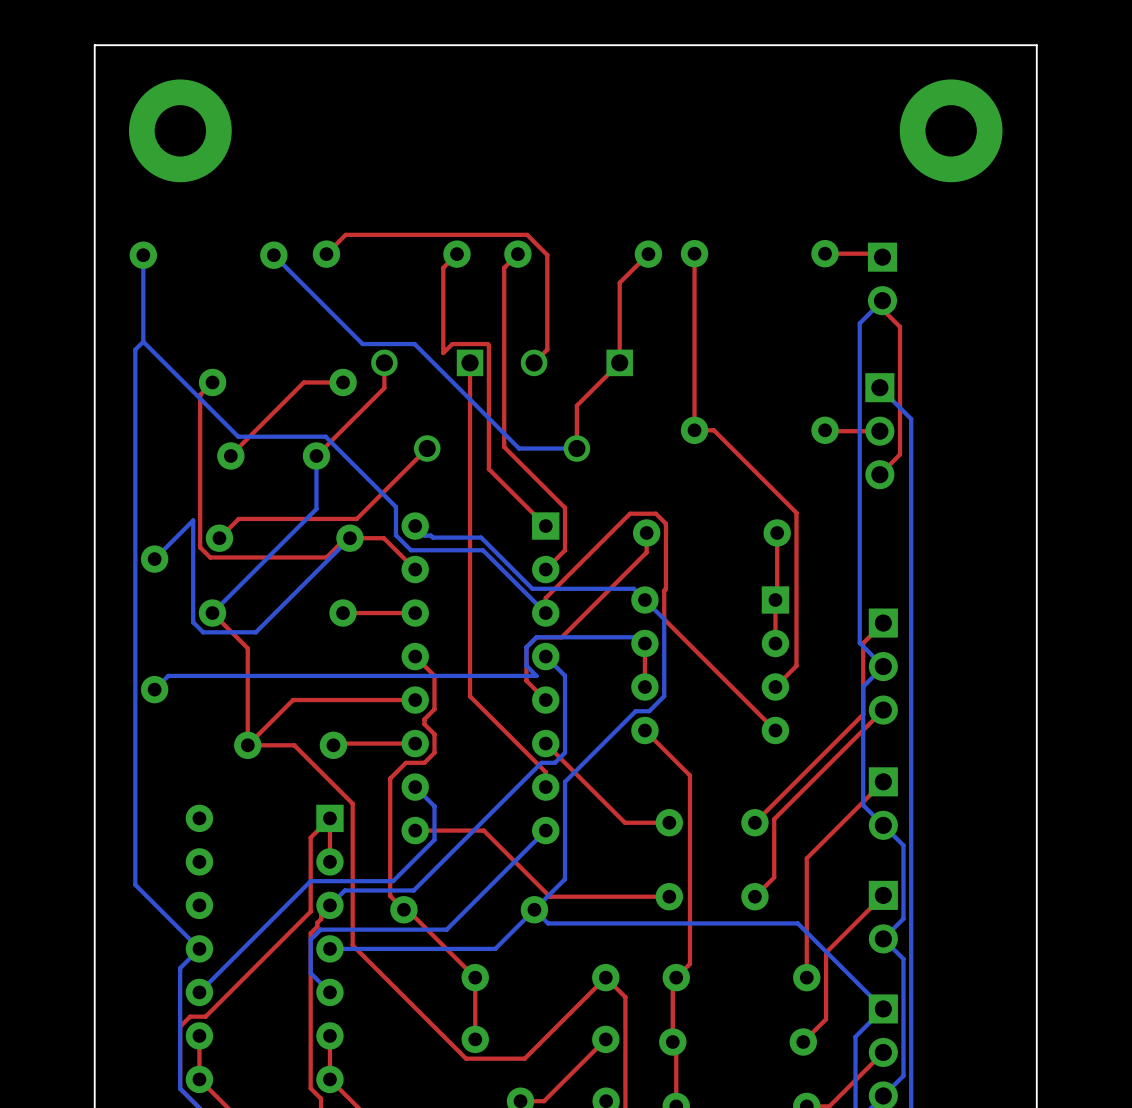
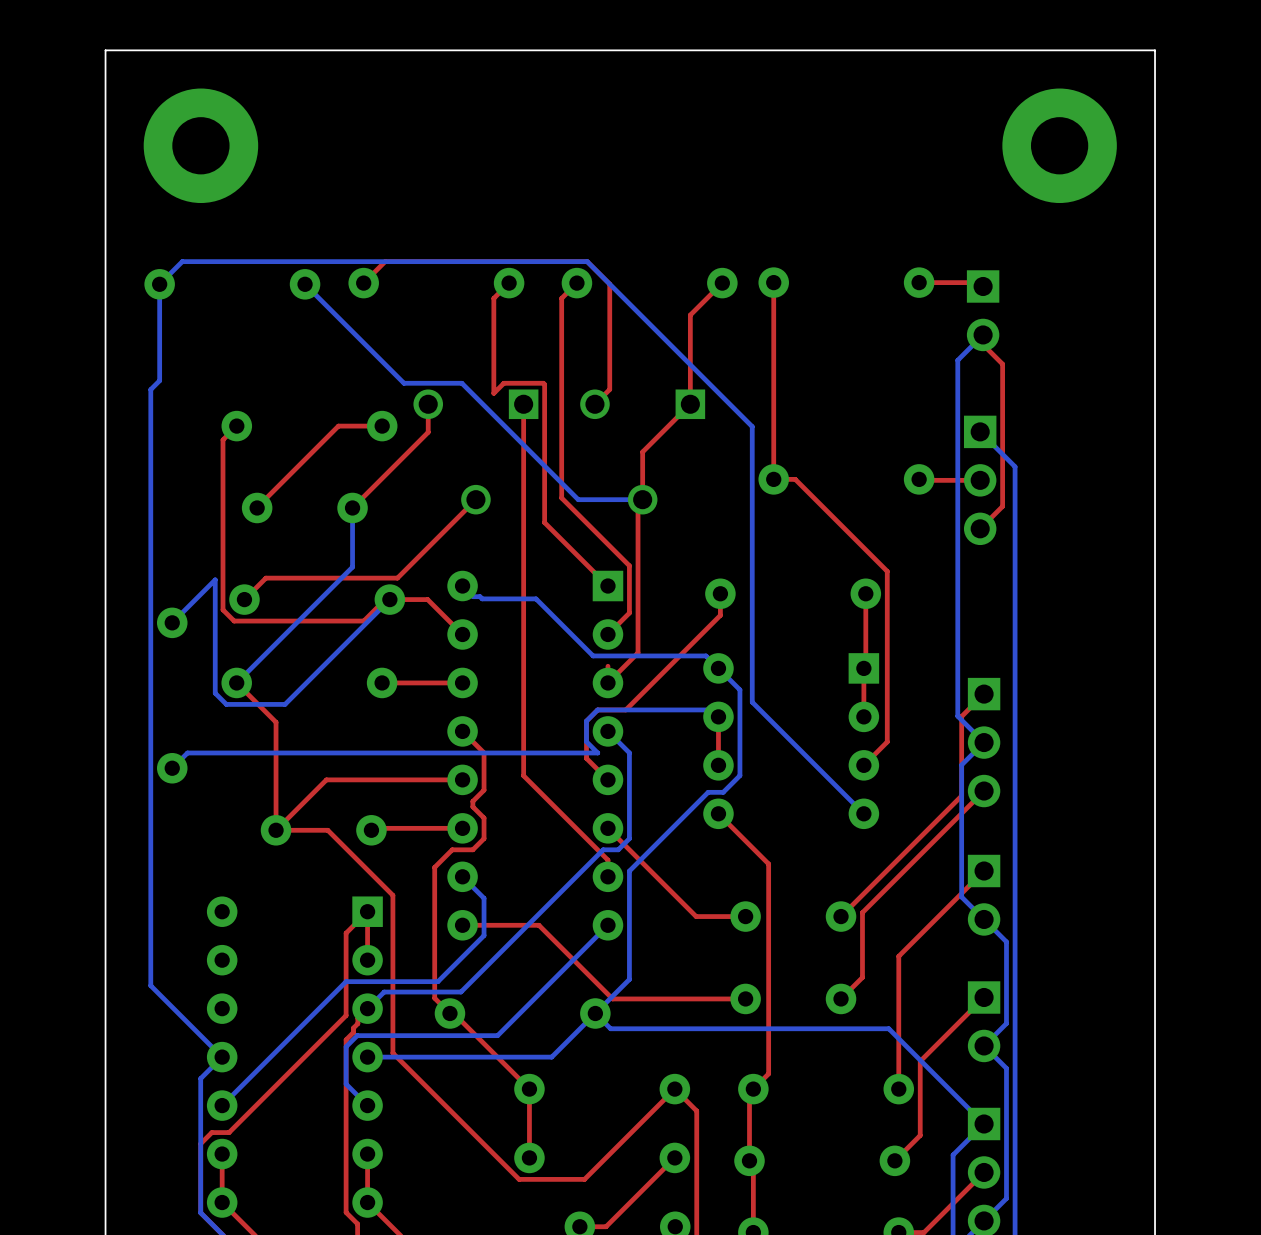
bottom track: none -> (159, 284) (182, 261) (587, 261) (752, 426) (752, 702) (863, 813)
bottom track: (143, 341) (238, 436) (325, 436) (395, 506) (395, 535) (410, 550) (482, 550) (545, 613) -> none
top track: none -> (642, 499) (638, 504) (638, 652) (607, 682)
top track: (545, 598) (630, 513) (655, 513) (665, 523) (664, 619) (775, 730) -> none

